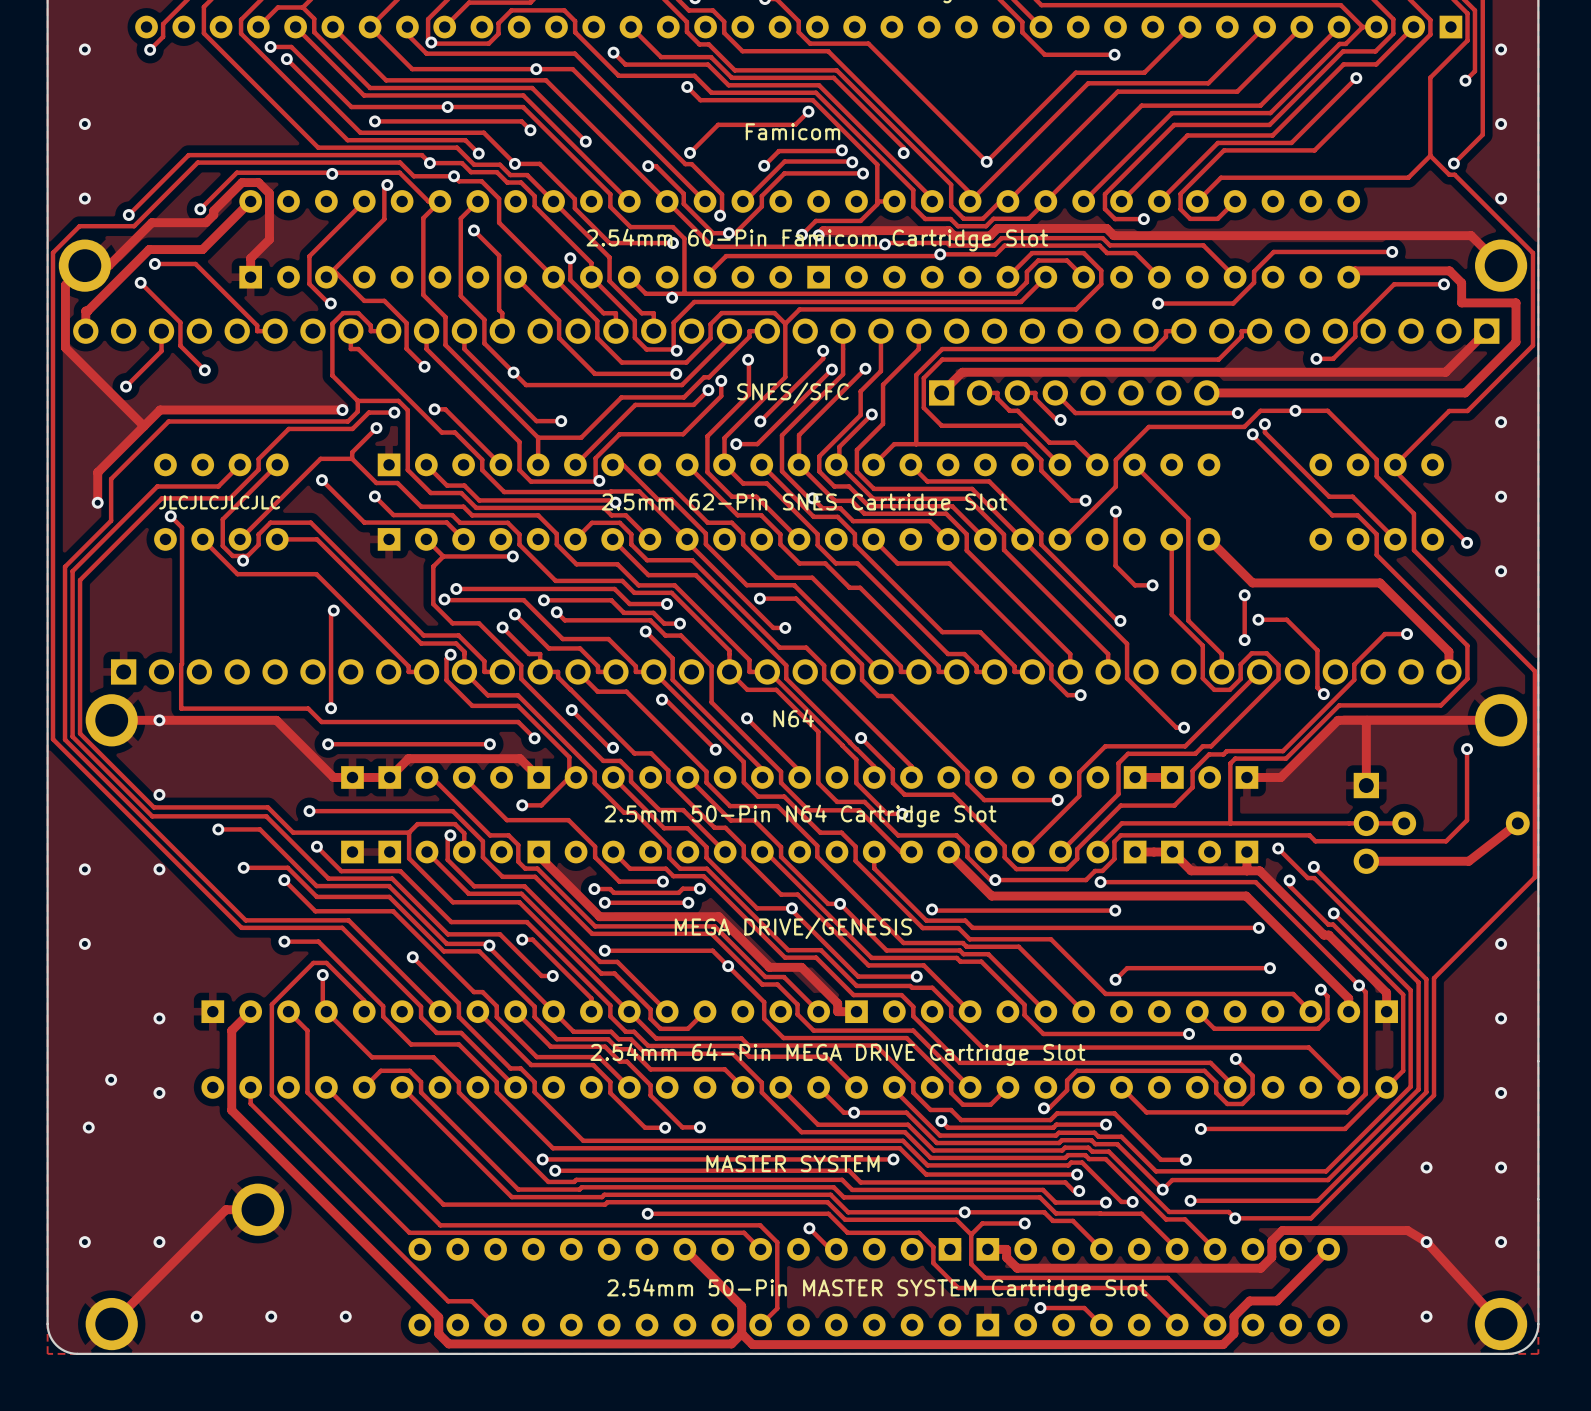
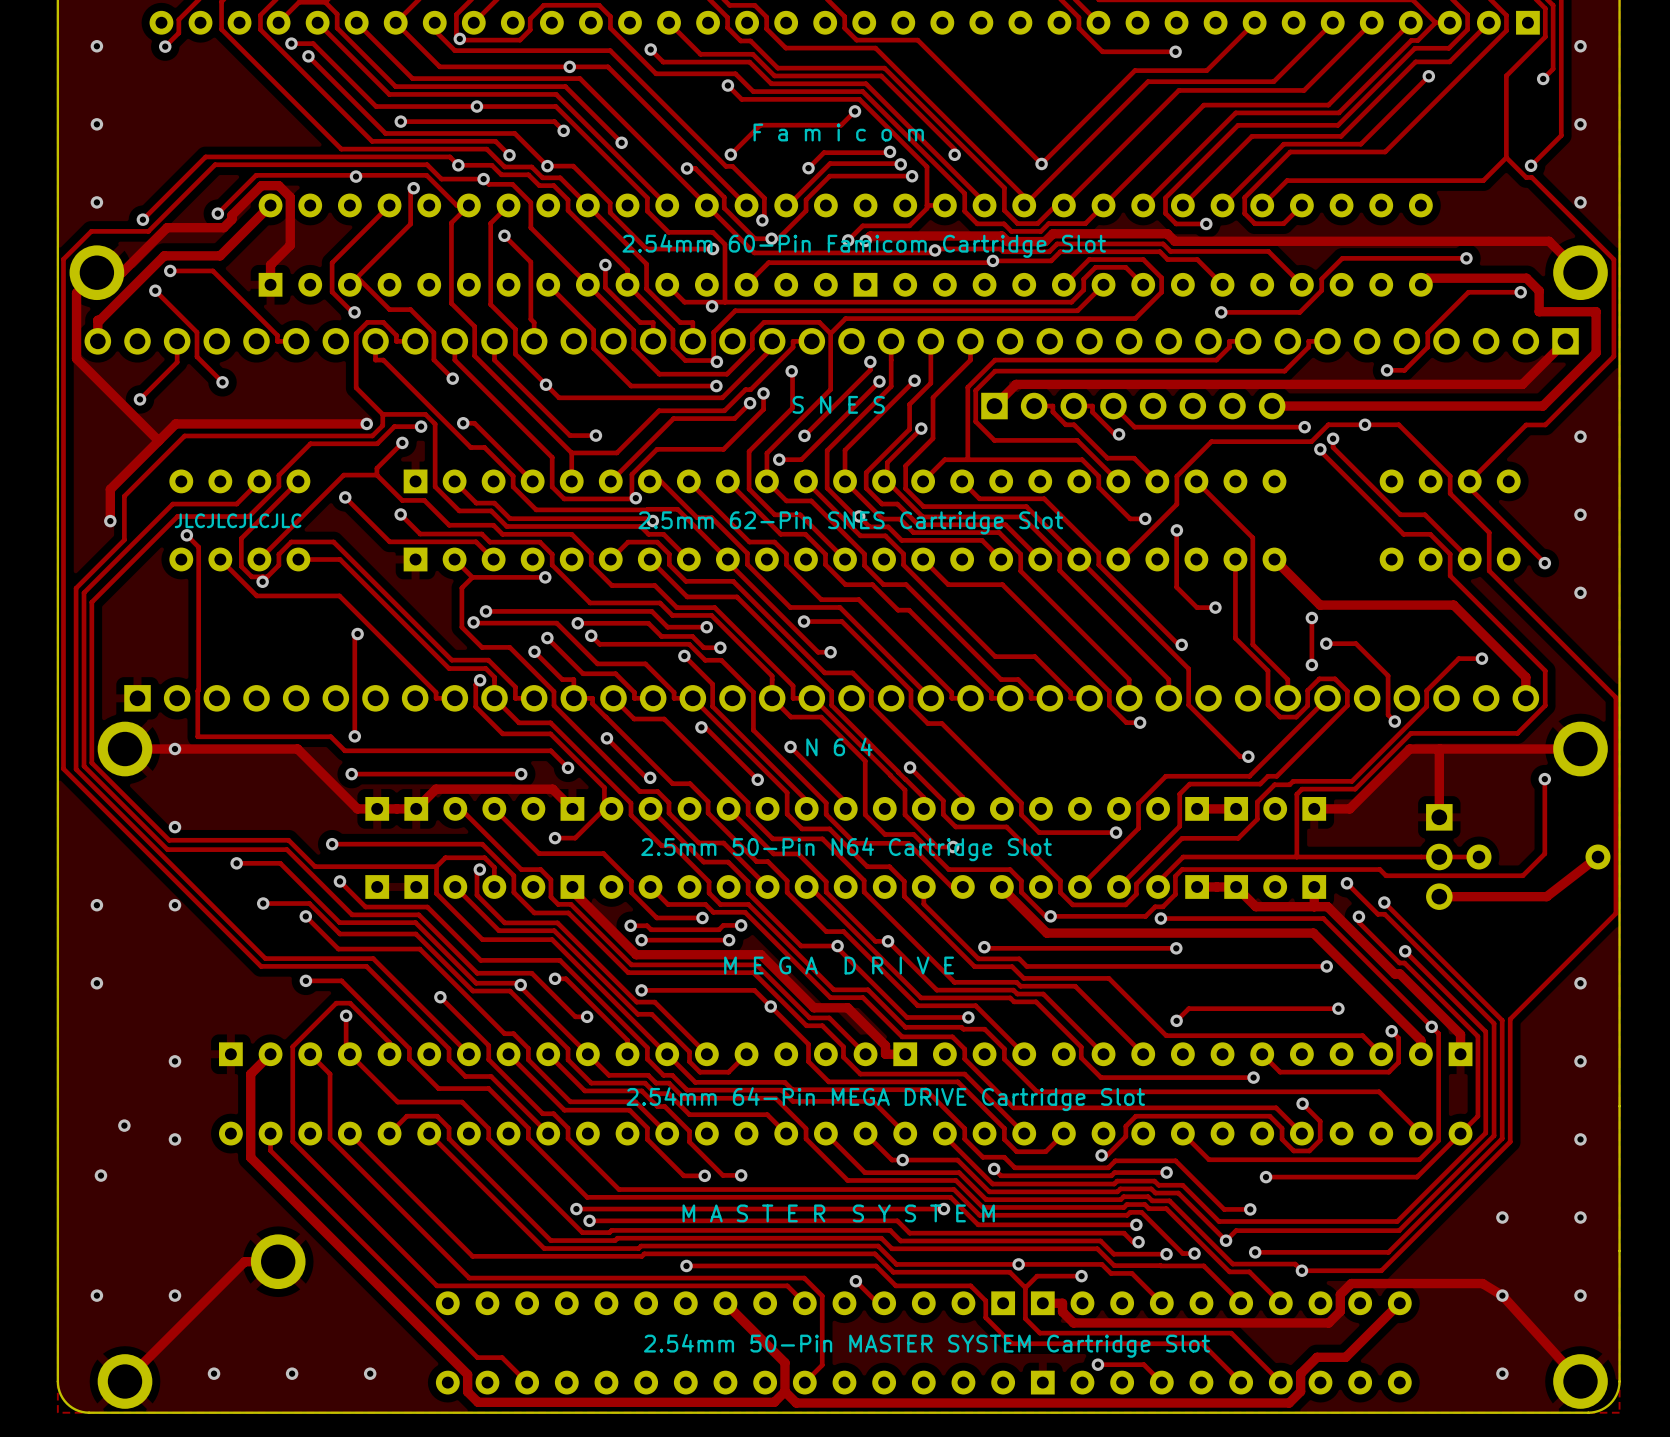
text: Famicom (792, 131) -> F a m i c o m (838, 132)
text: SNES/SFC (792, 393) -> S N E S (838, 404)
text: N64 (793, 718) -> N 6 4 (839, 746)
text: MEGA DRIVE/GENESIS (793, 928) -> M E G A D R I V E (839, 965)
text: MASTER SYSTEM (792, 1163) -> M A S T E R S Y S T E M (838, 1213)

